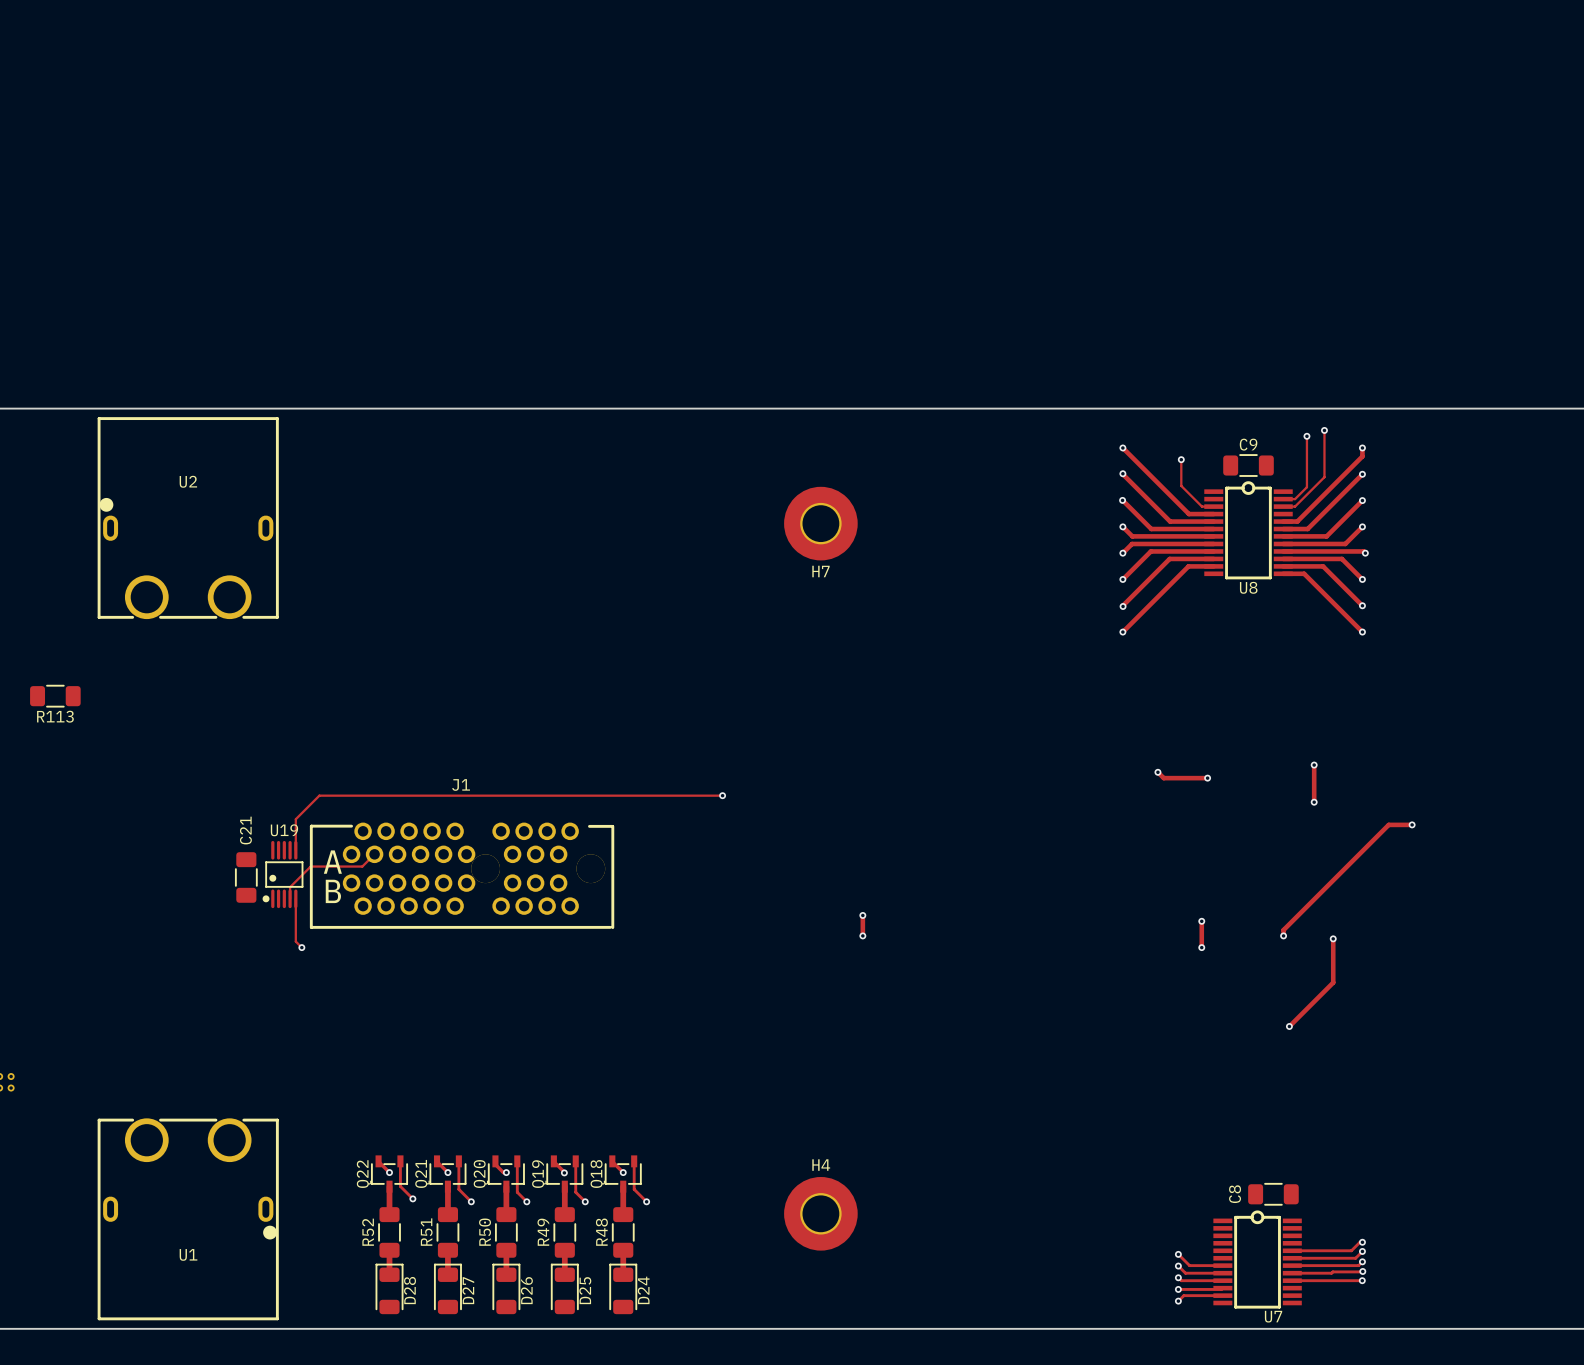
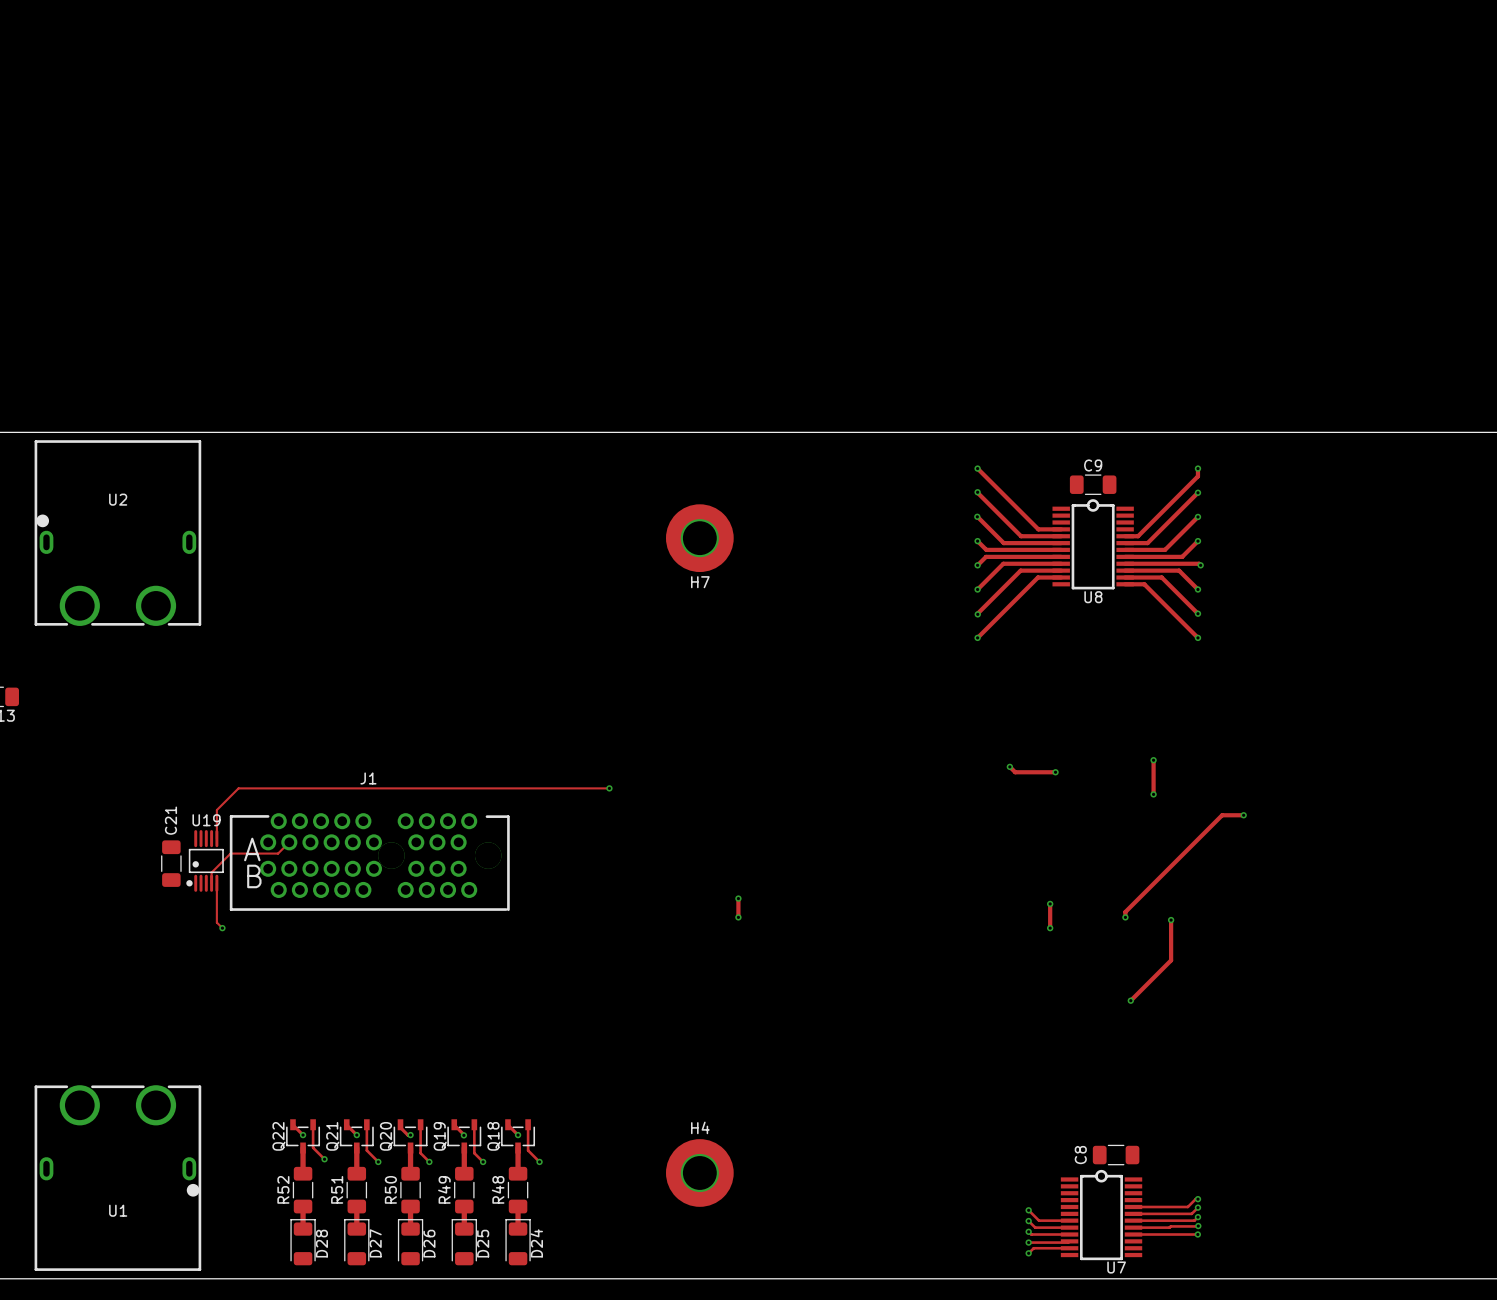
track: (1324, 430) (1324, 477) (1295, 506) (1283, 506) -> none
via: (1324, 430) -> none
track: (1306, 436) (1306, 487) (1295, 499) (1283, 499) -> none
via: (1306, 436) -> none
track: (1181, 459) (1181, 485) (1201, 506) (1213, 506) -> none
via: (1181, 459) -> none

